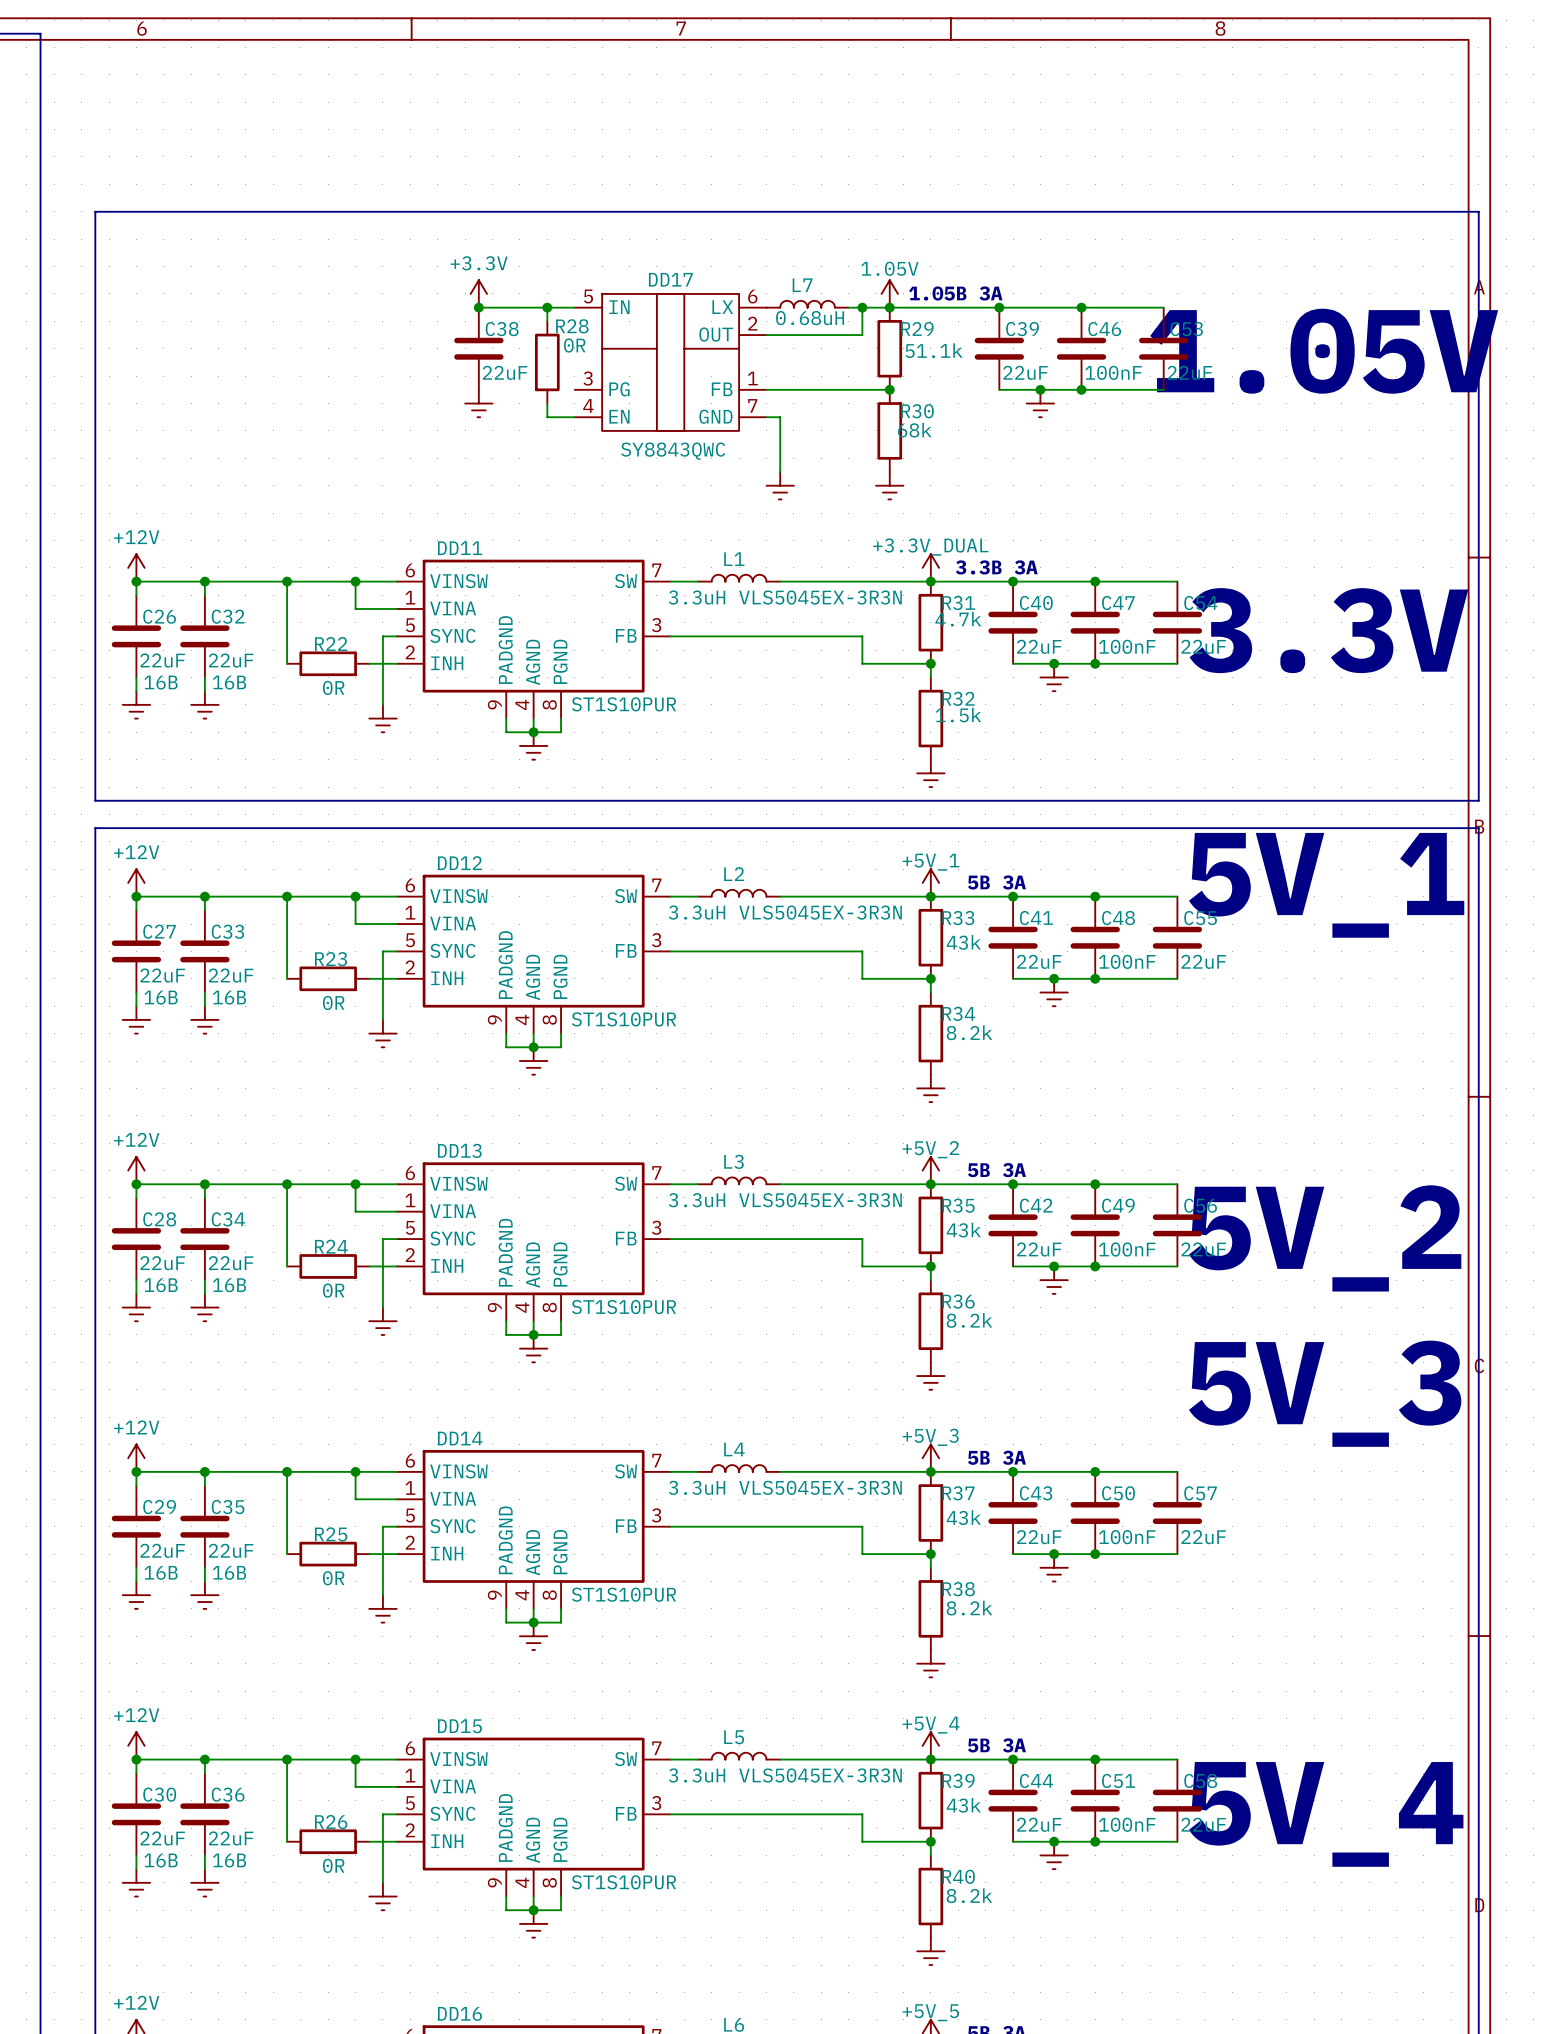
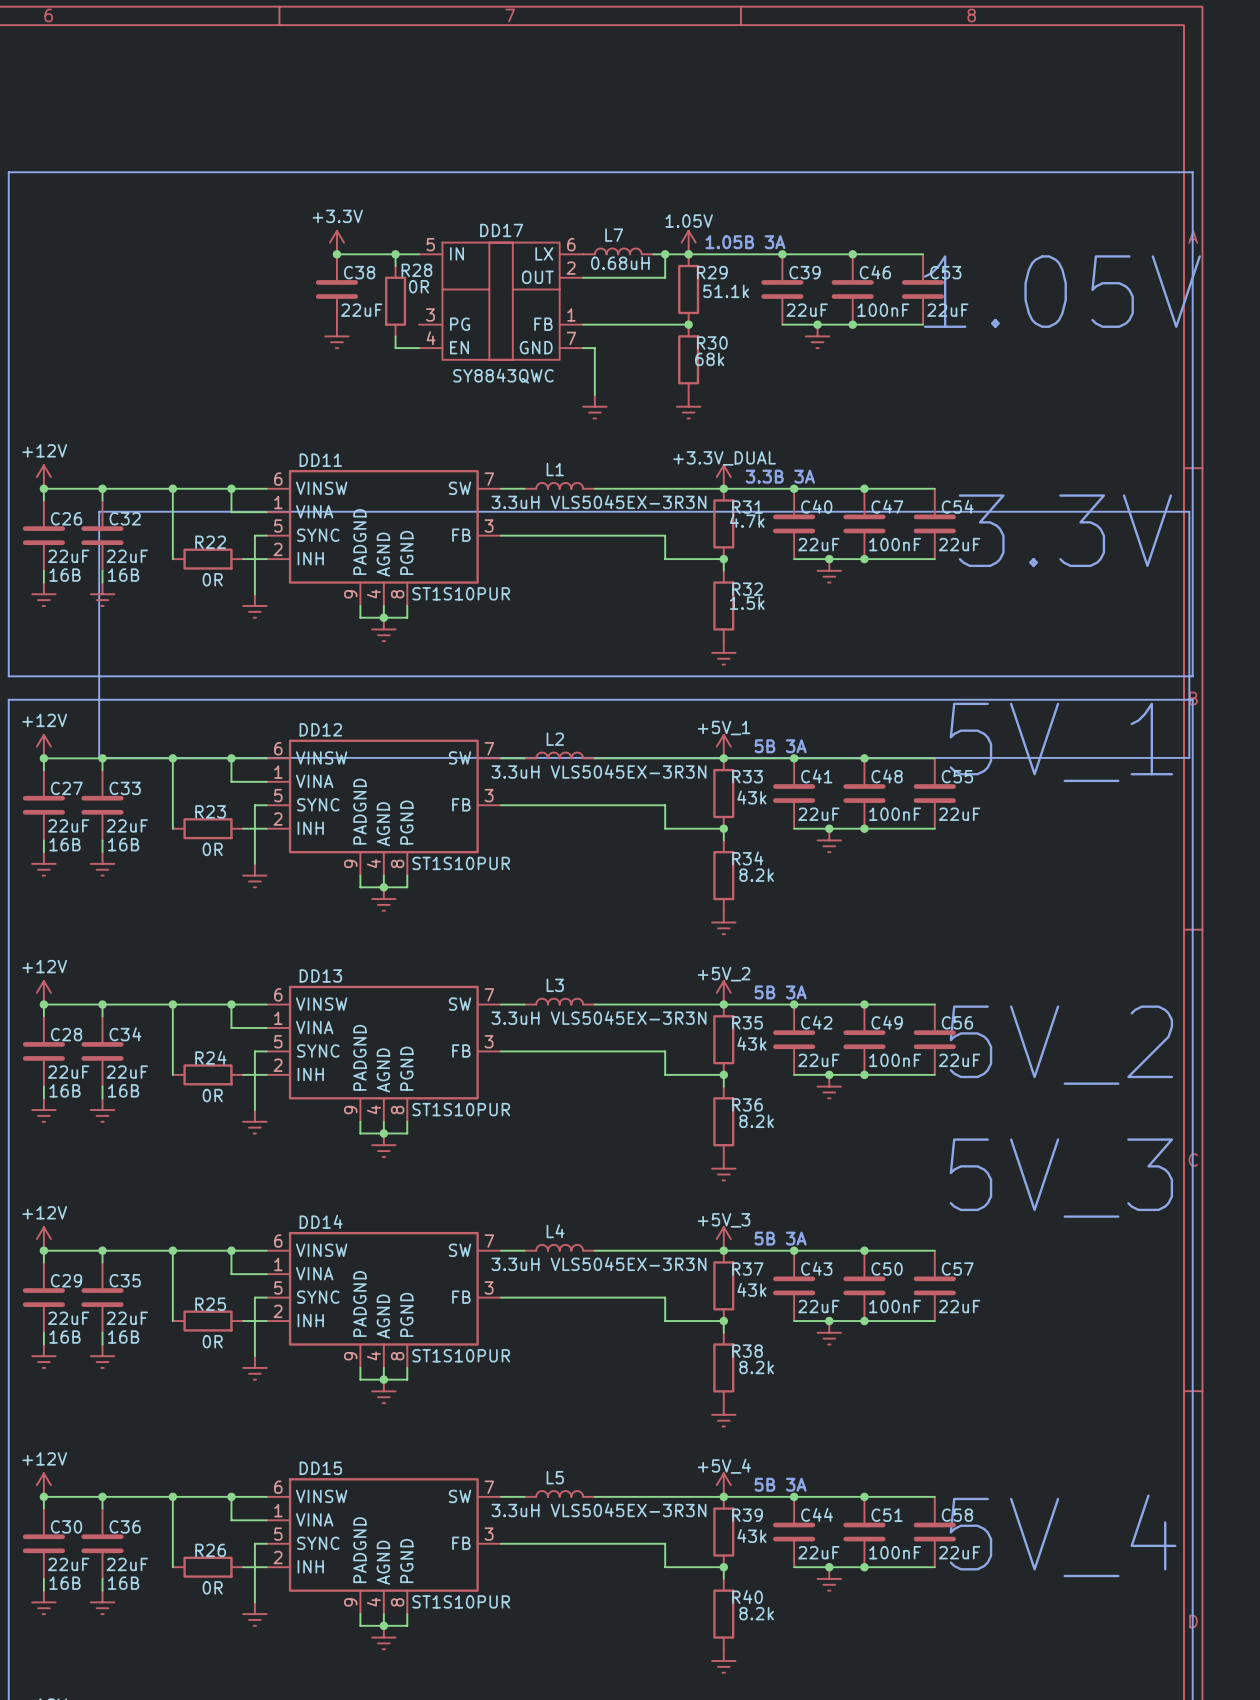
line: none -> (99, 511) (1189, 511) (1189, 757) (99, 757) (99, 511)

